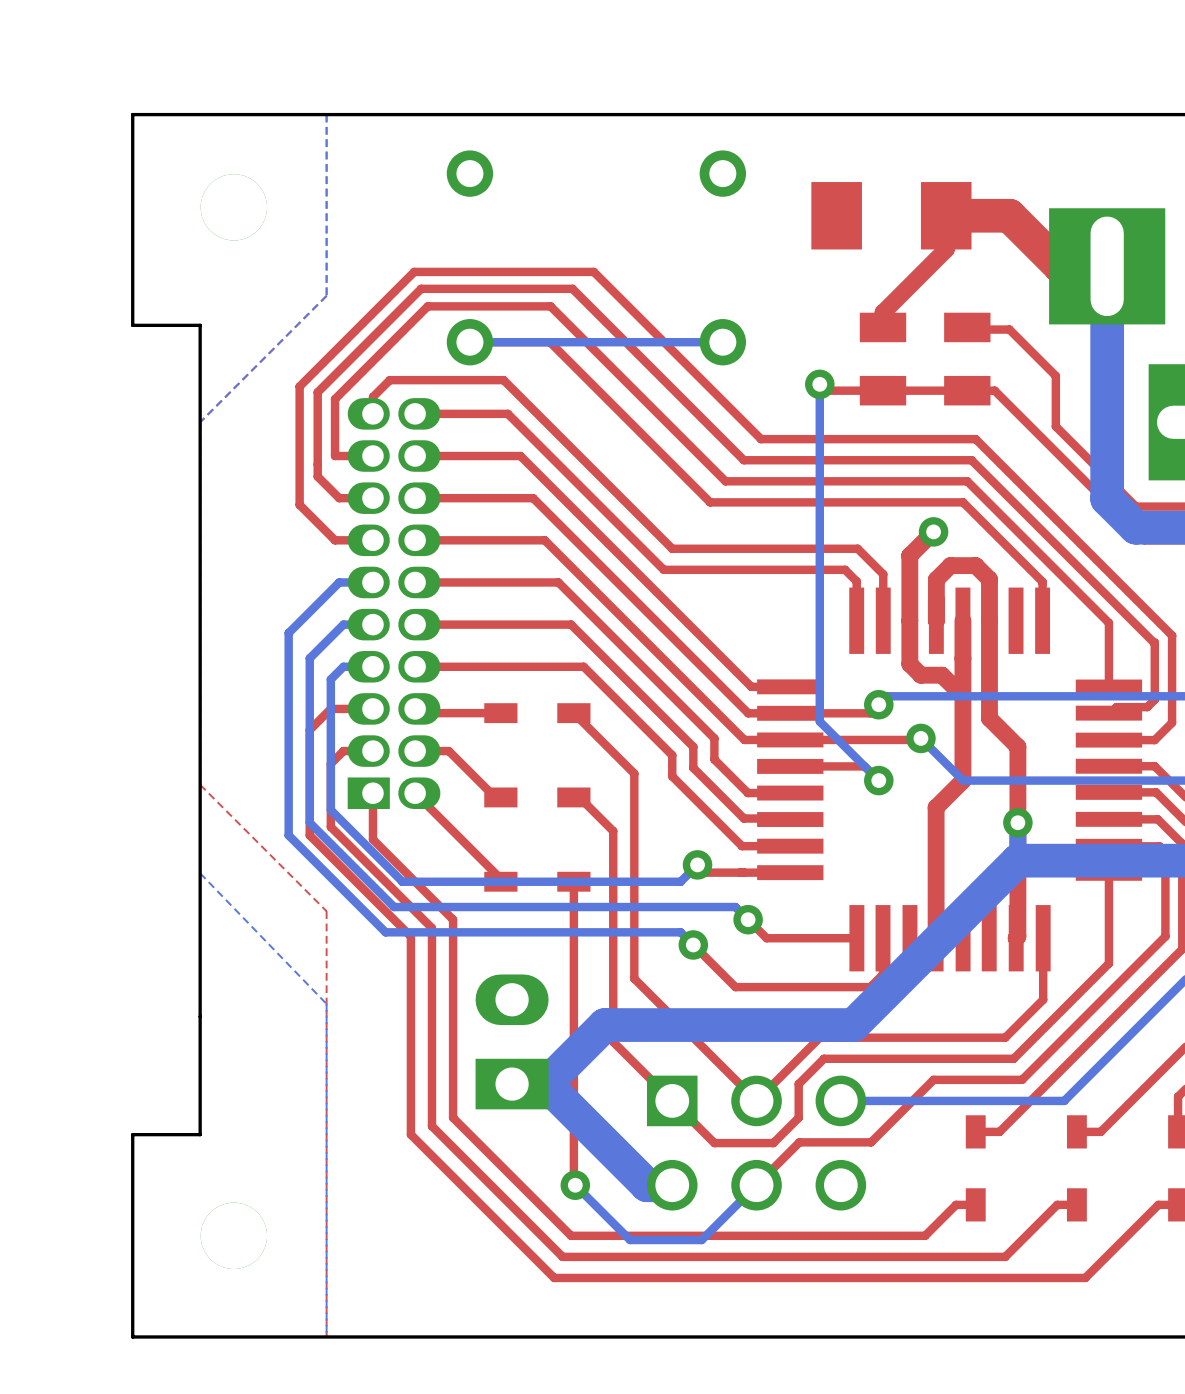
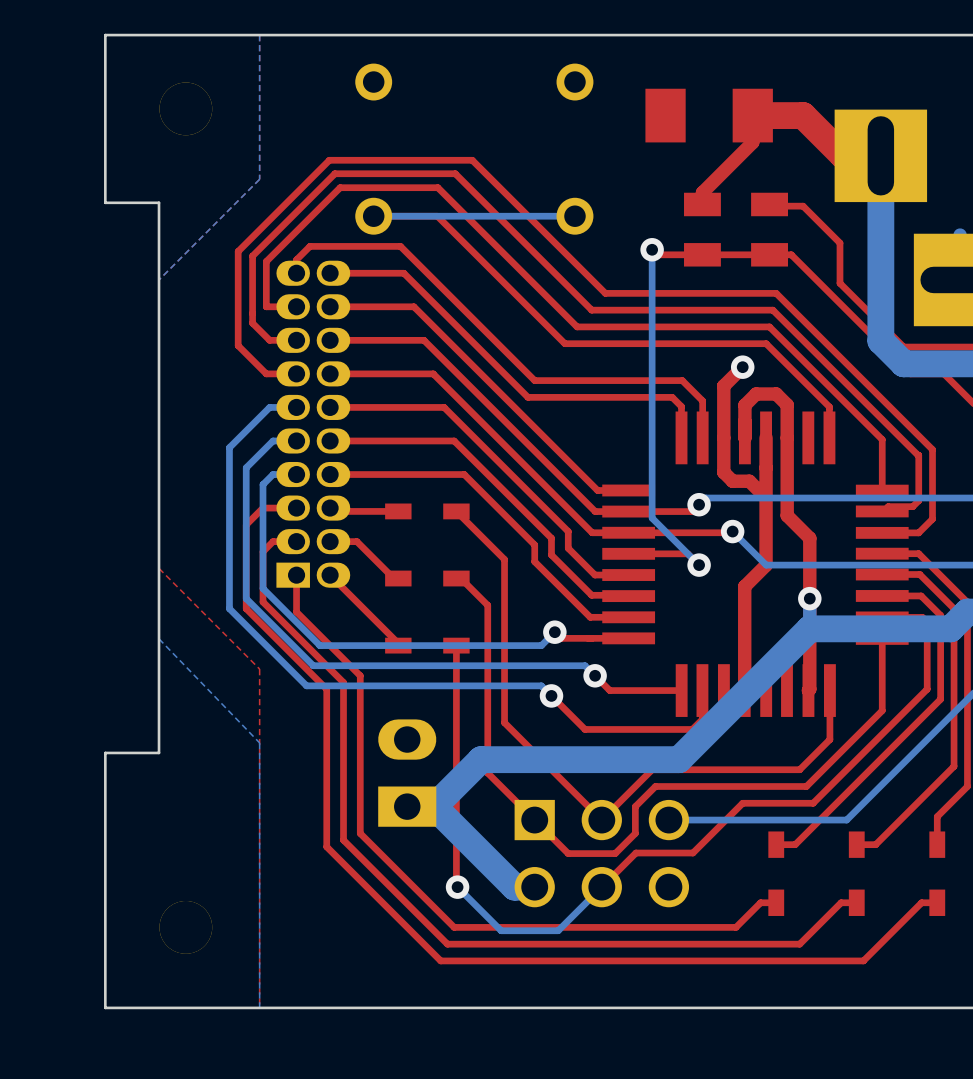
board edge: (200, 1016) (200, 1134) (132, 1134) -> (159, 752) (105, 752) (105, 846)

